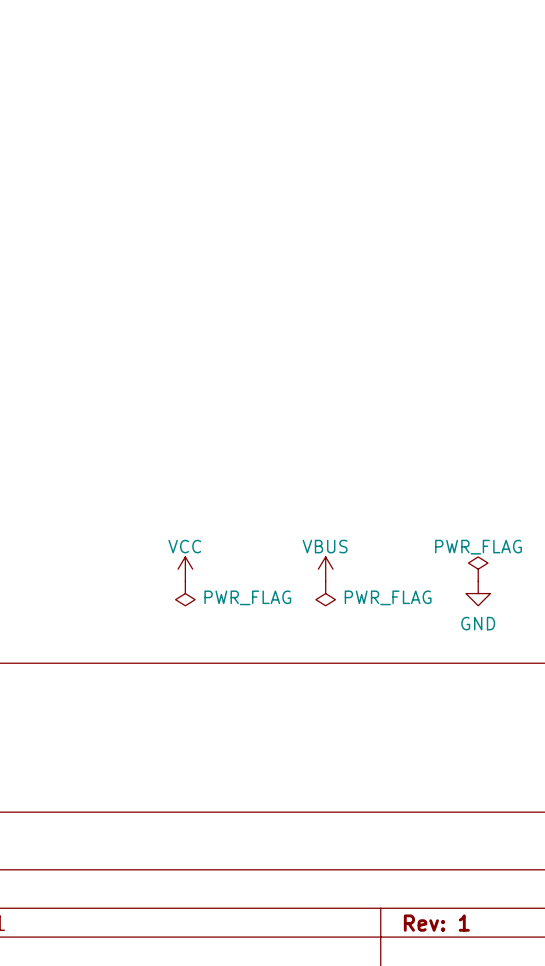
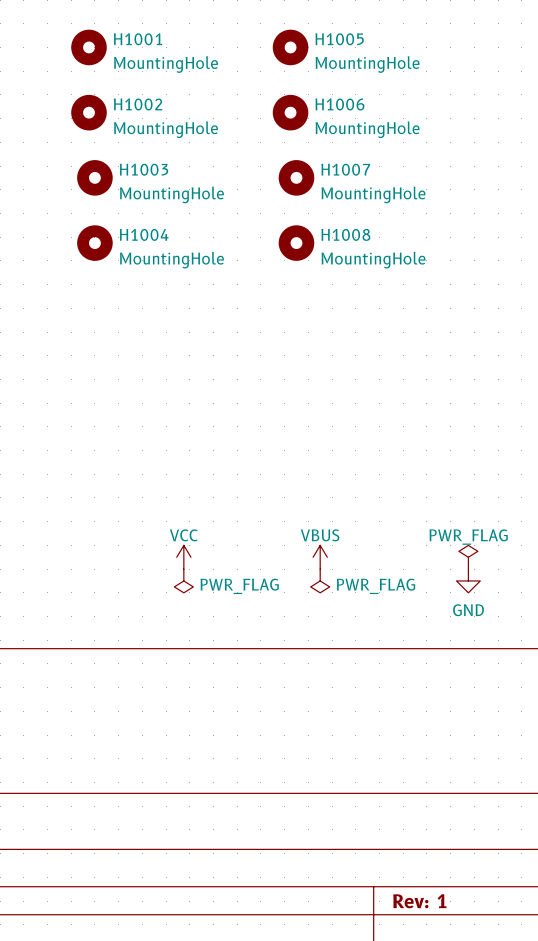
H1001: none -> MountingHole (89, 47)
H1005: none -> MountingHole (290, 47)
H1002: none -> MountingHole (89, 112)
H1006: none -> MountingHole (290, 112)
H1003: none -> MountingHole (94, 177)
H1007: none -> MountingHole (296, 177)
H1004: none -> MountingHole (94, 243)
H1008: none -> MountingHole (296, 243)

